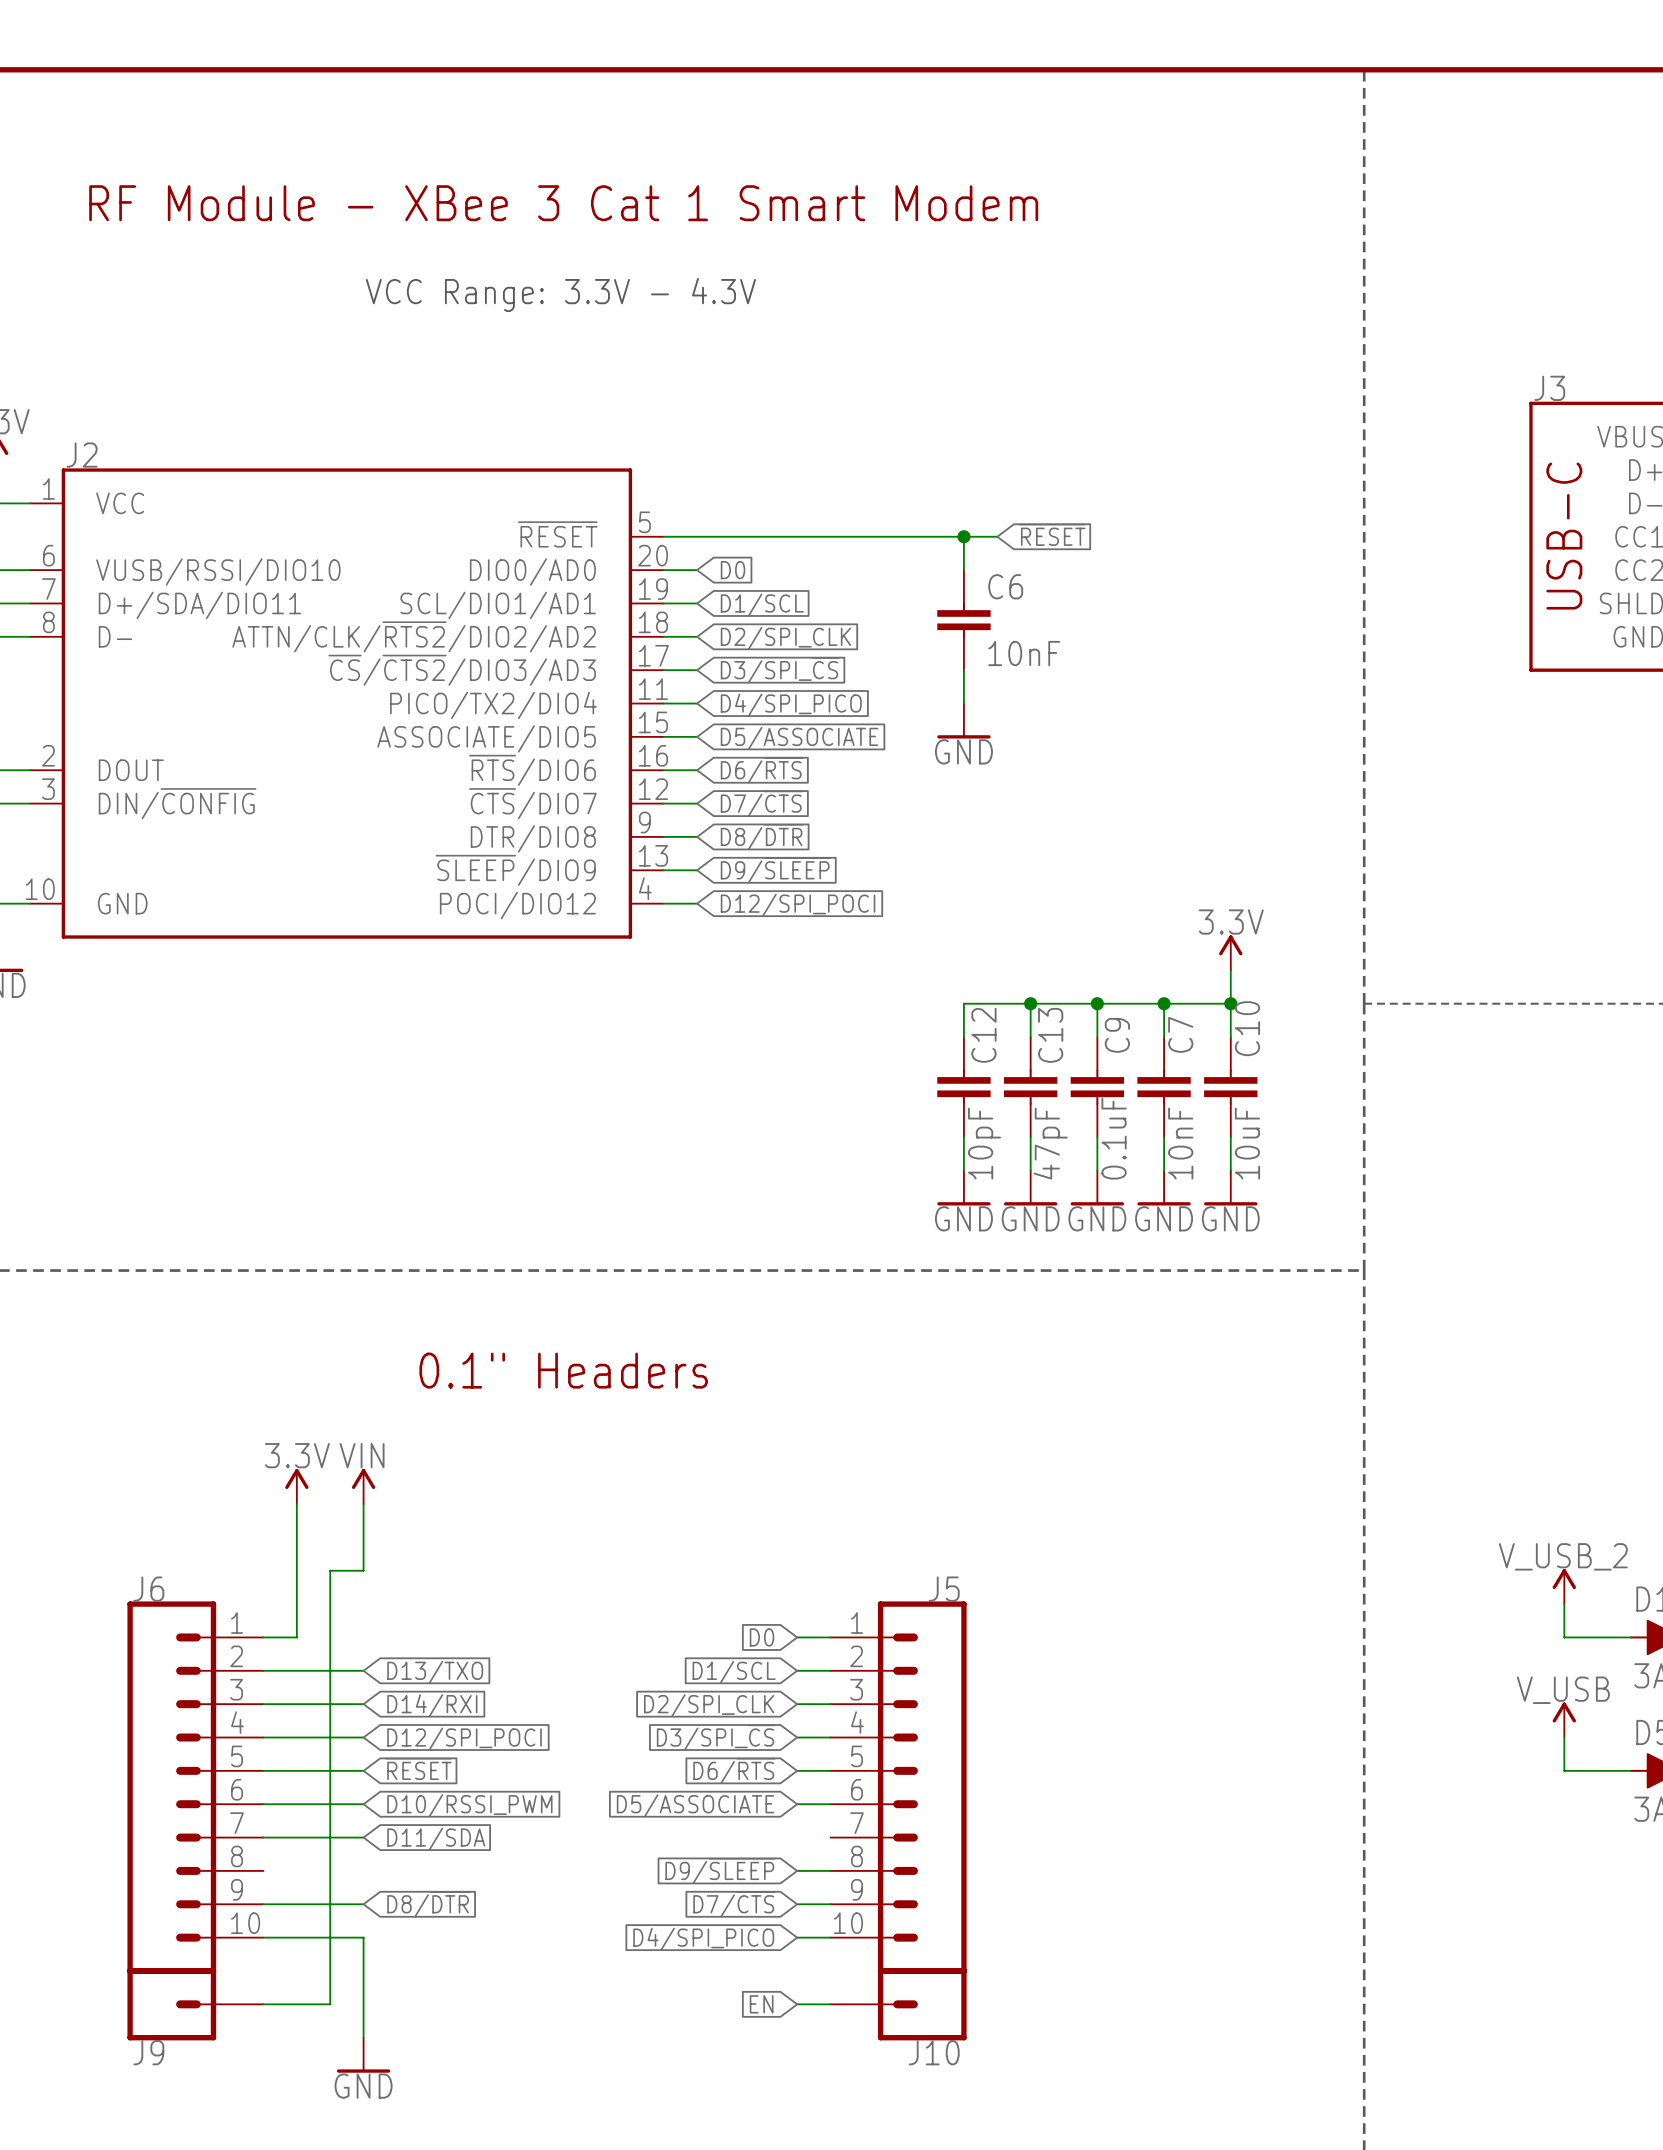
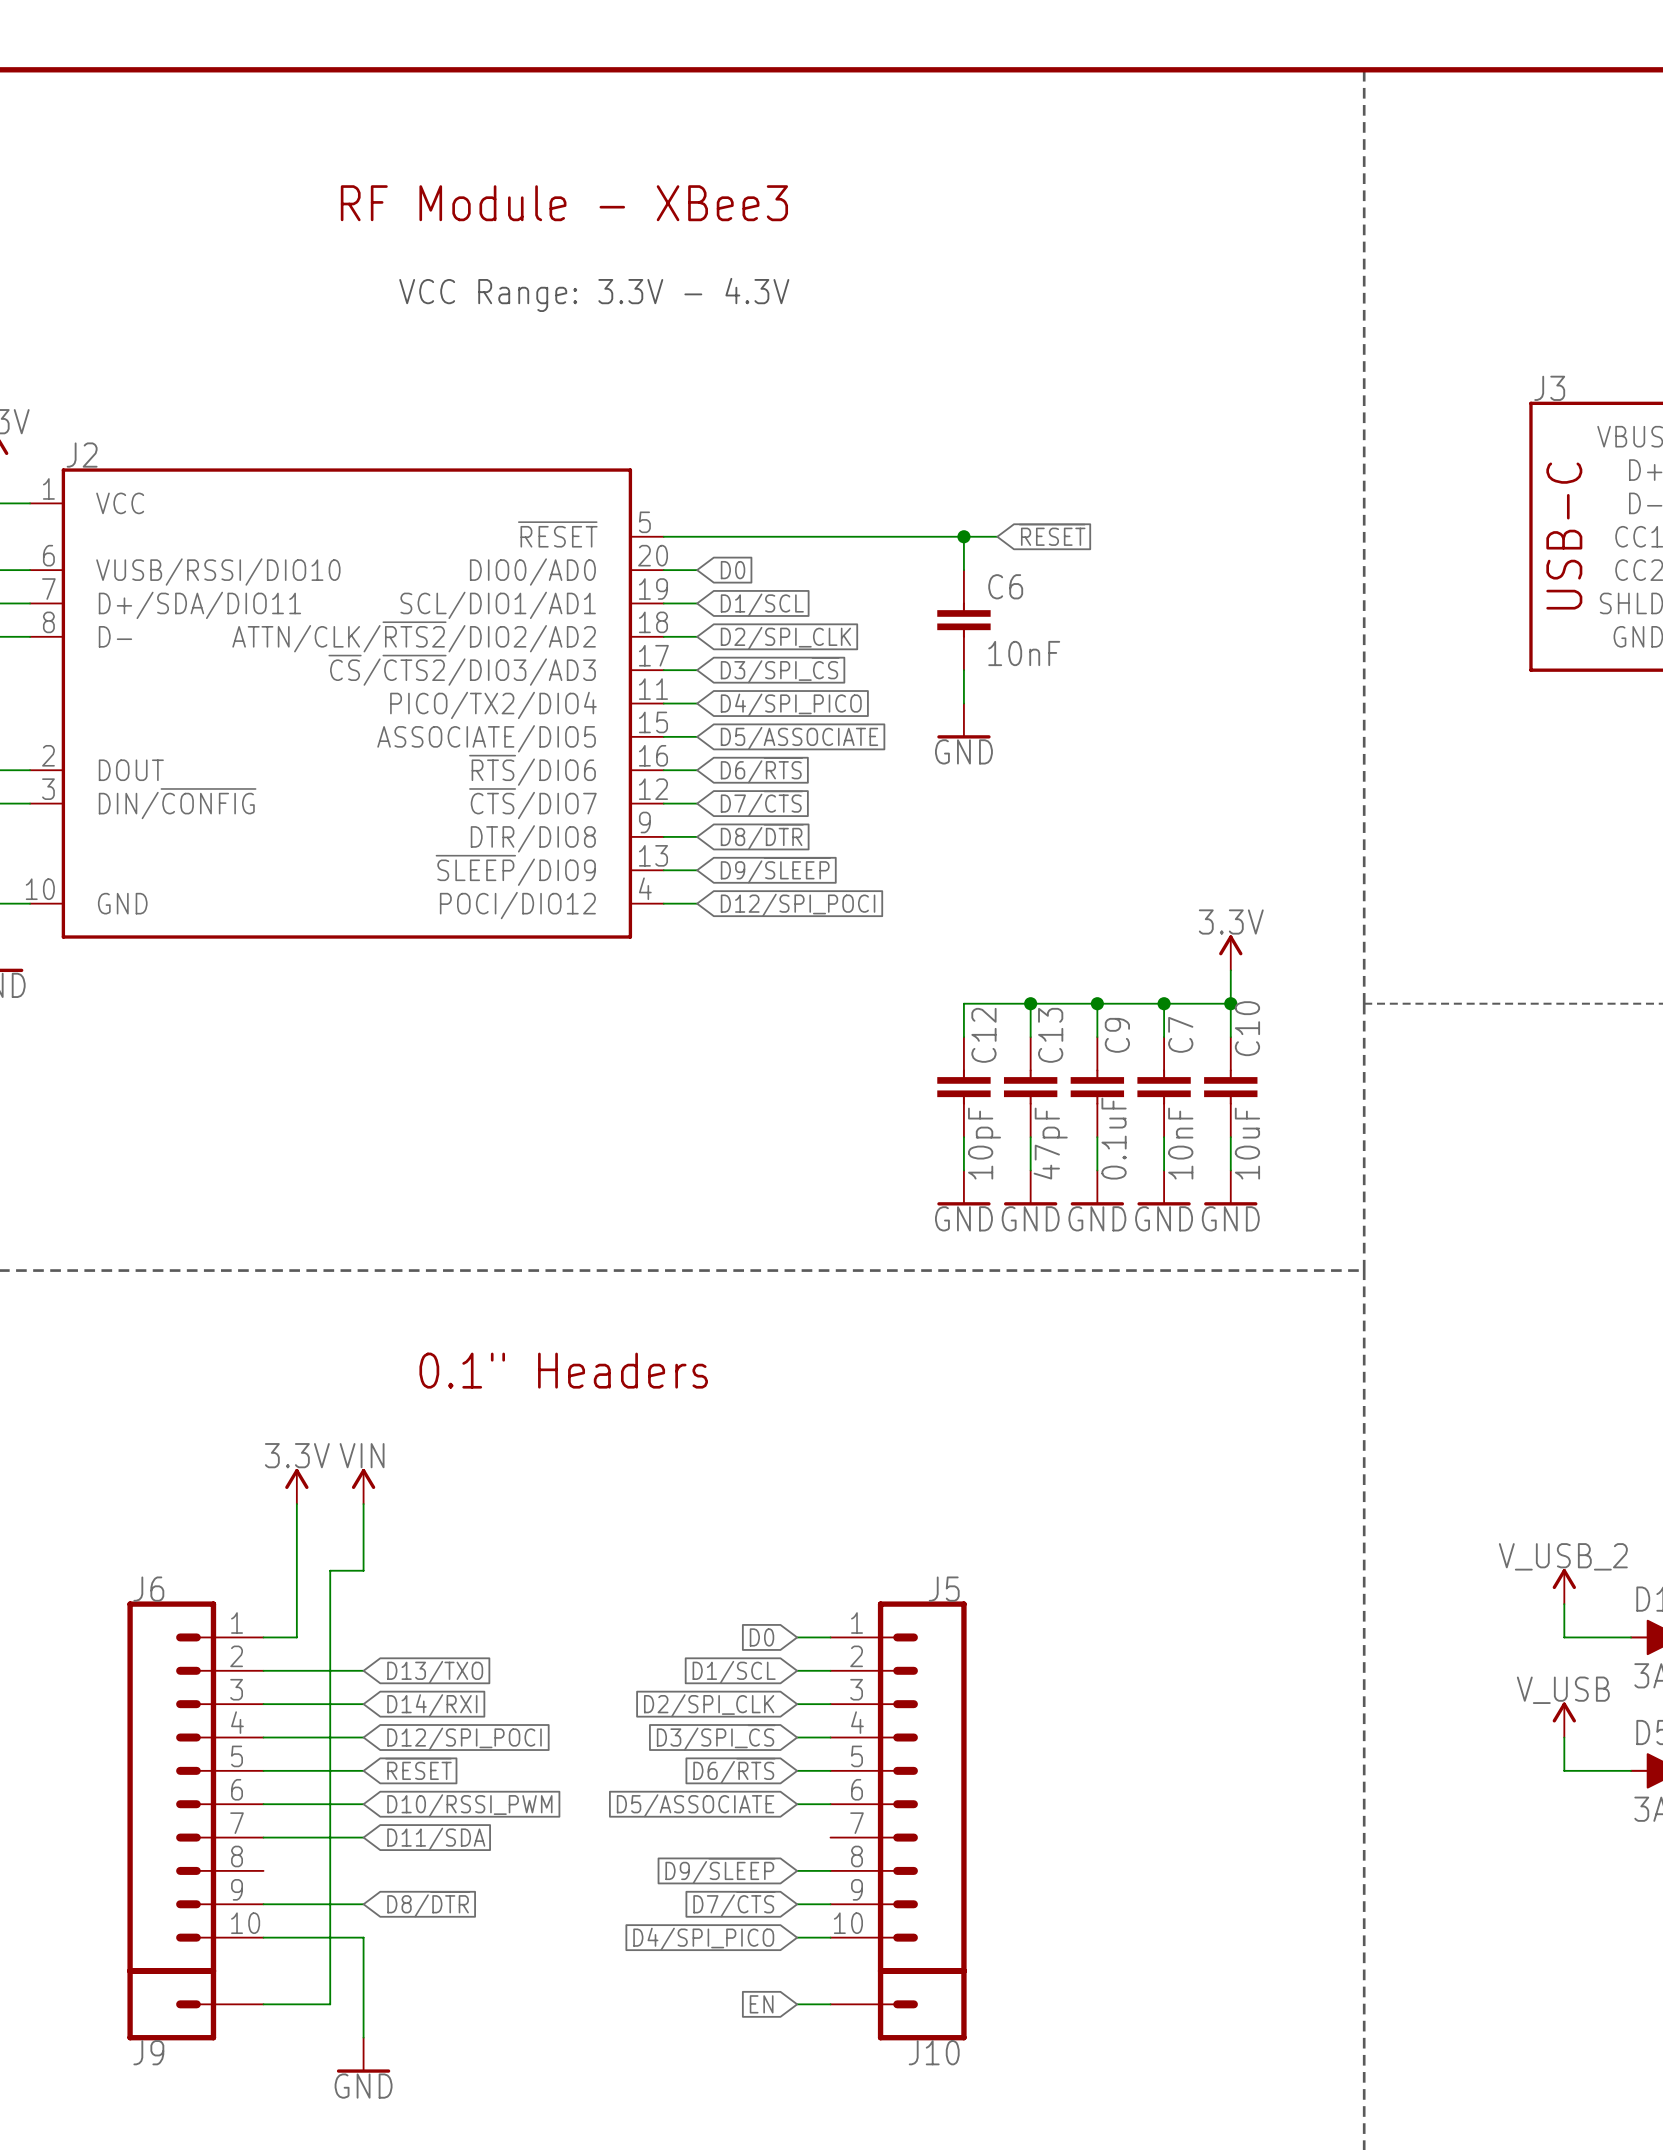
text: RF Module - XBee 3 Cat 1 Smart Modem (563, 203) -> RF Module - XBee3 (564, 203)
text position: VCC Range: 3.3V - 4.3V (560, 294) -> VCC Range: 3.3V - 4.3V (594, 294)

